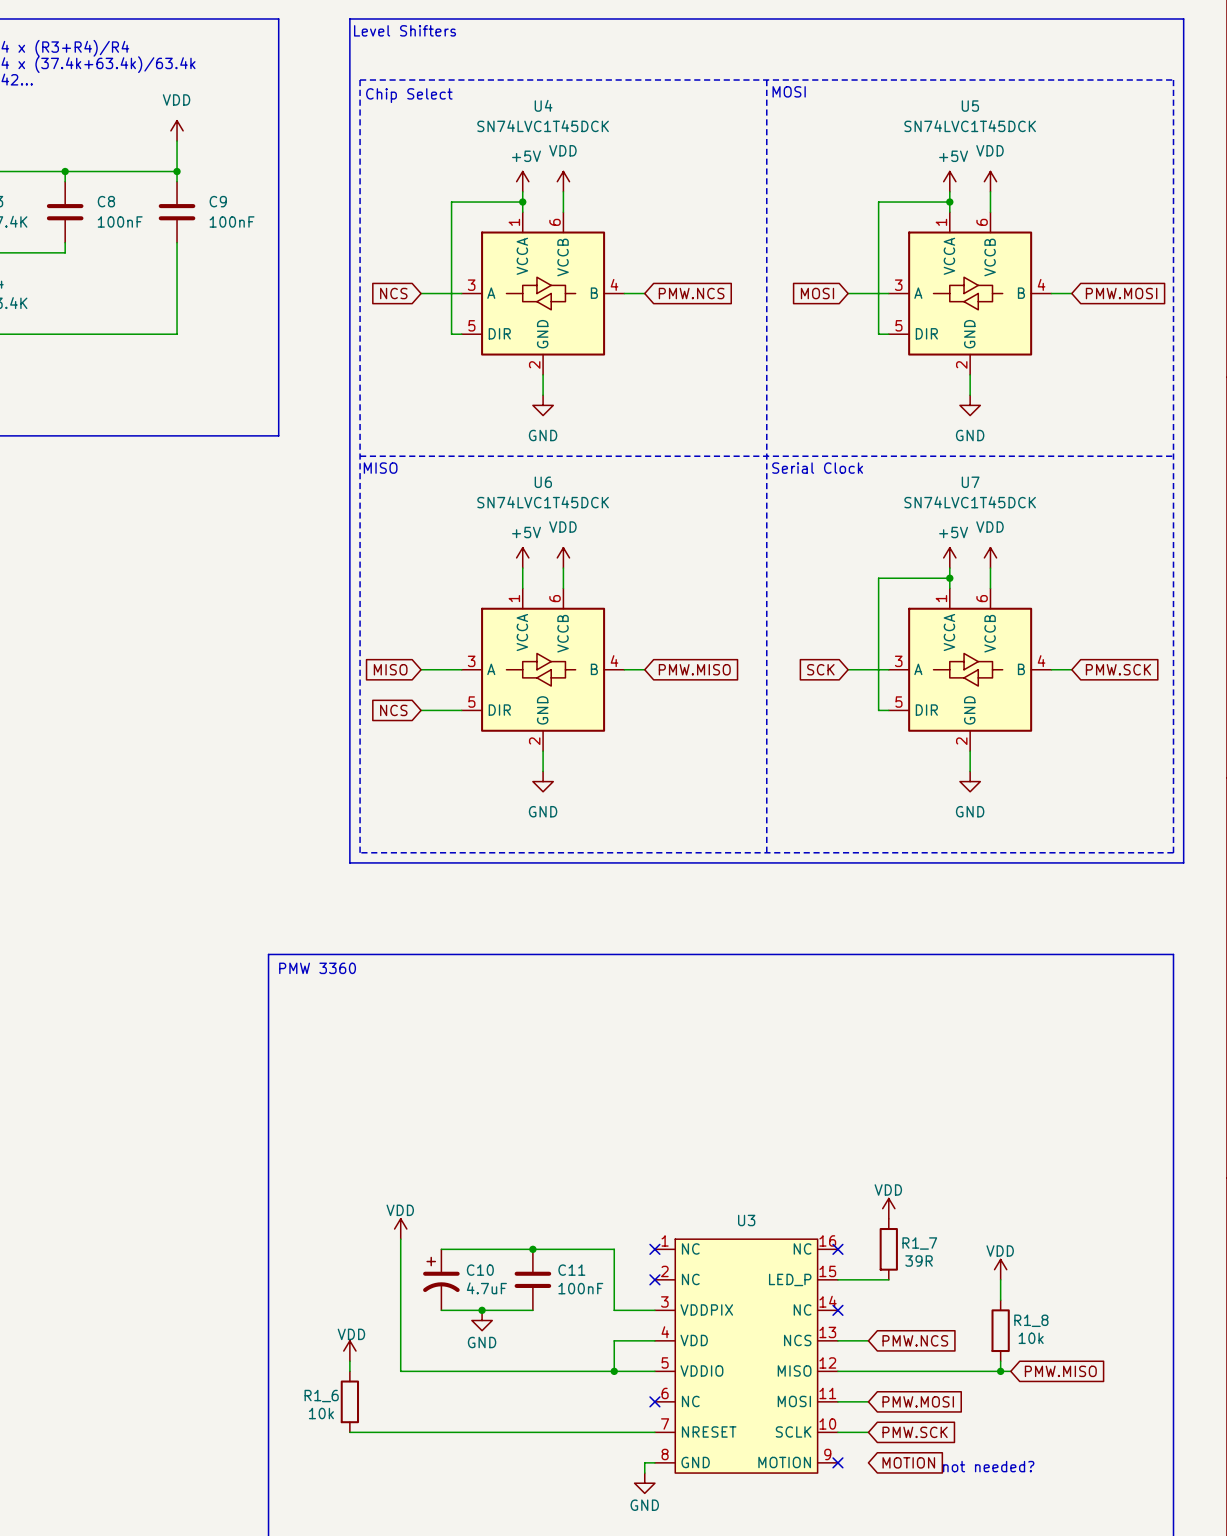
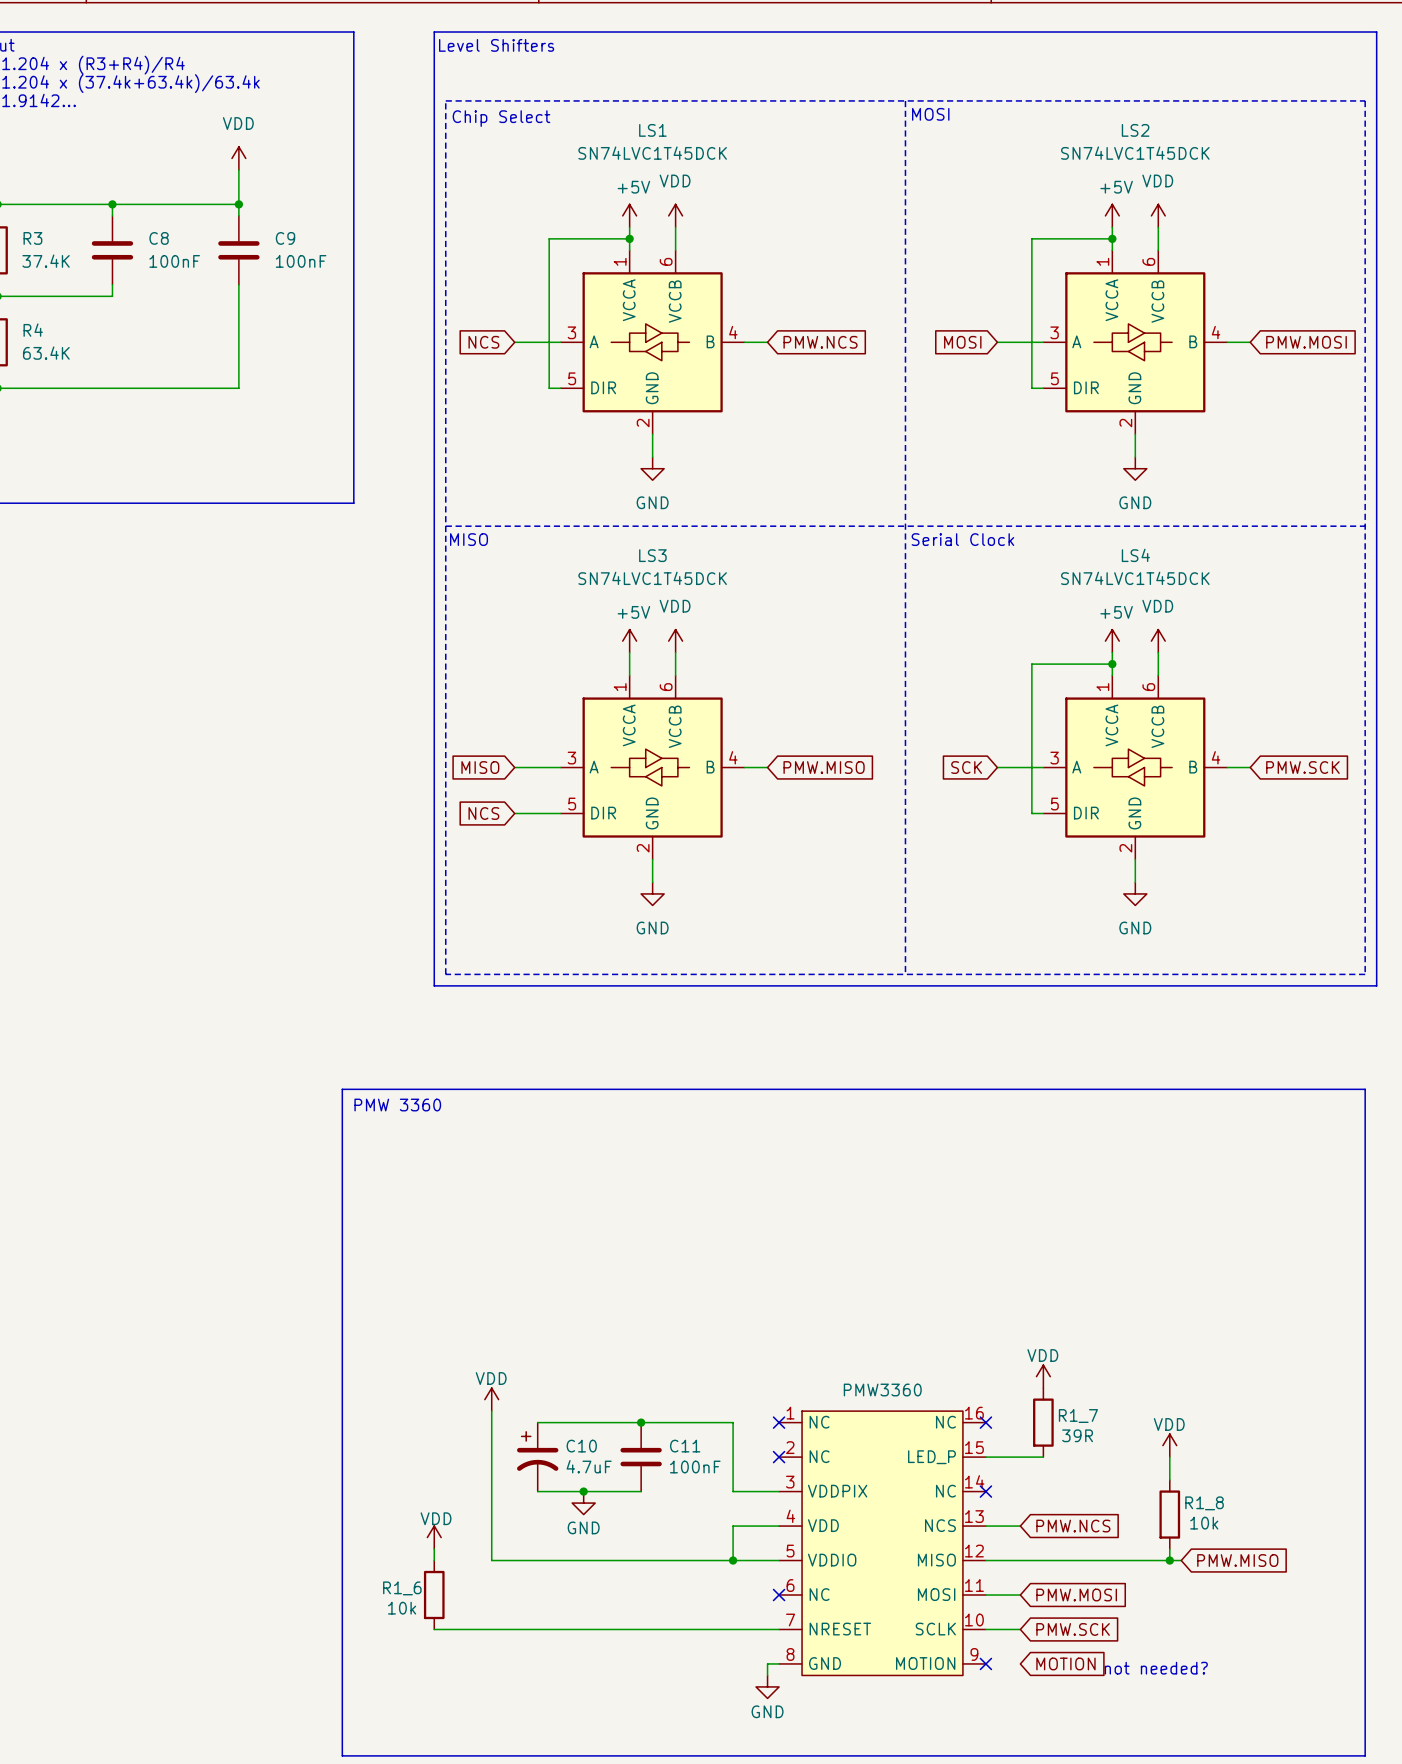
U4 name: U4 (543, 105) -> LS1 (652, 130)
U5 name: U5 (970, 106) -> LS2 (1135, 130)
U6 name: U6 (543, 482) -> LS3 (652, 555)
U7 name: U7 (970, 482) -> LS4 (1135, 555)
U3 name: U3 (746, 1220) -> PMW3360 (882, 1390)

